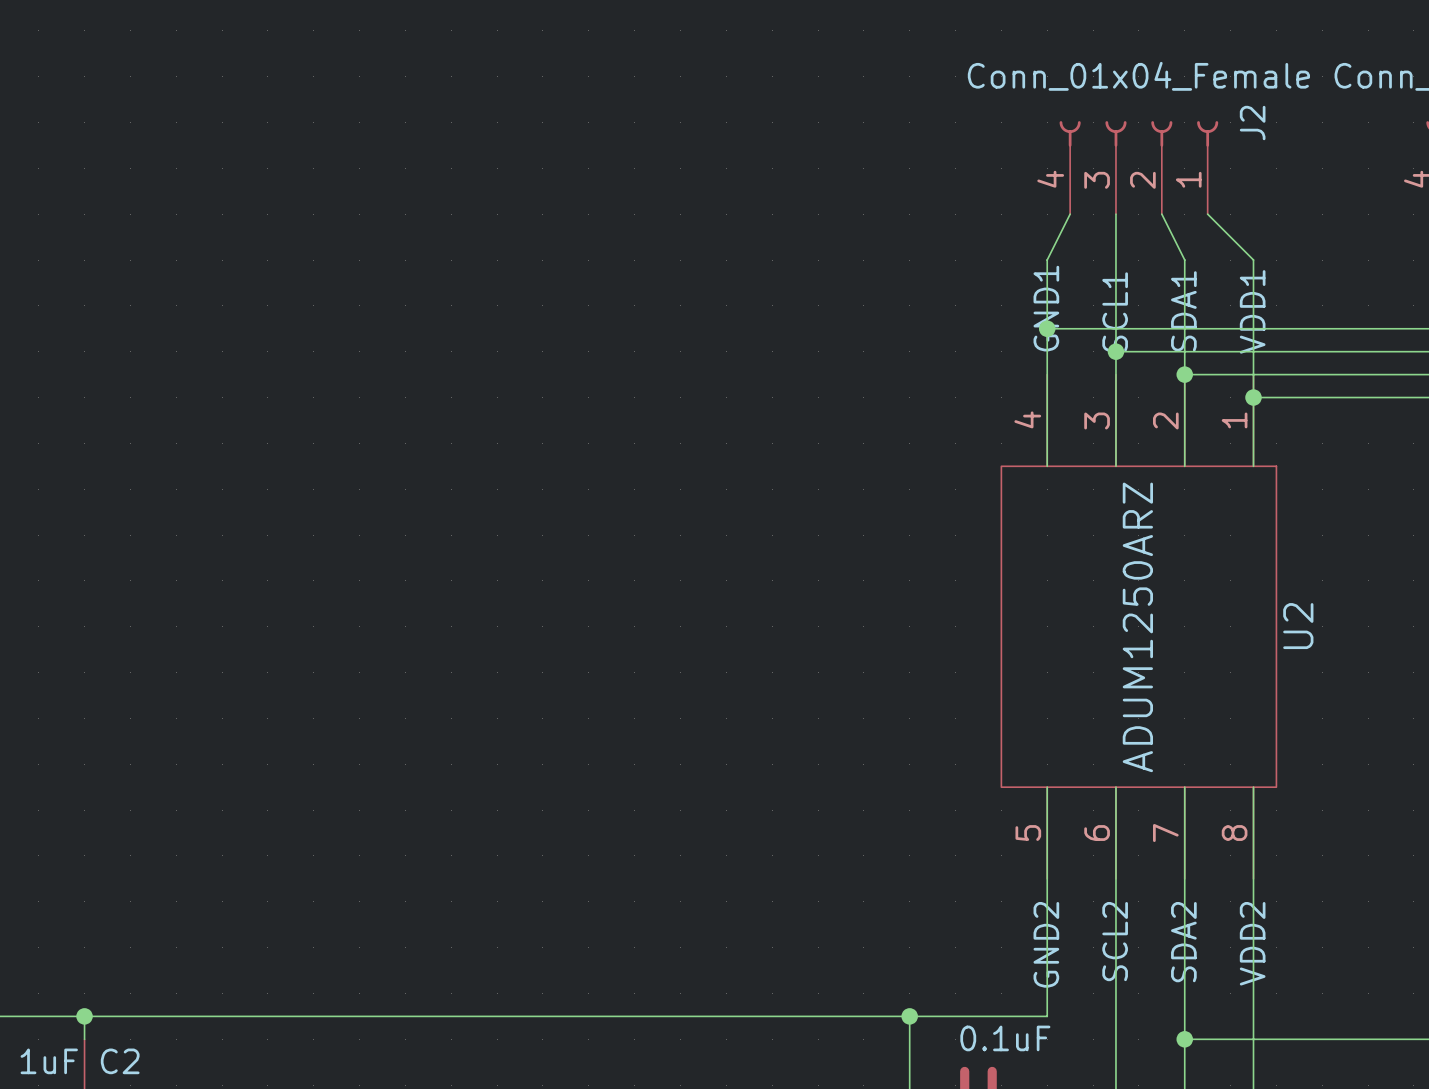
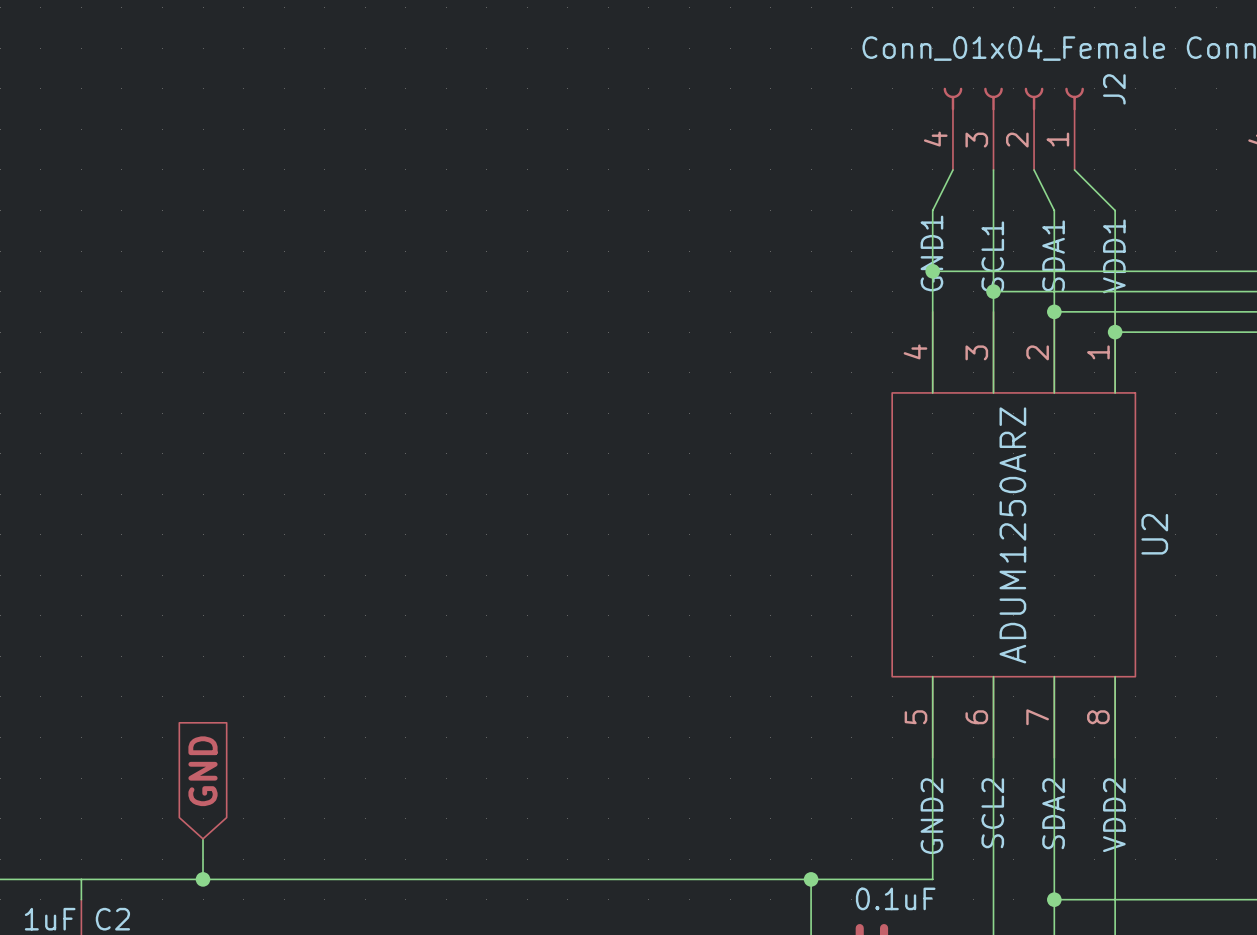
global label: none -> GND (203, 771)
wire: none -> (203, 838) (203, 879)
junction: (84, 1016) -> none
junction: none -> (203, 879)

